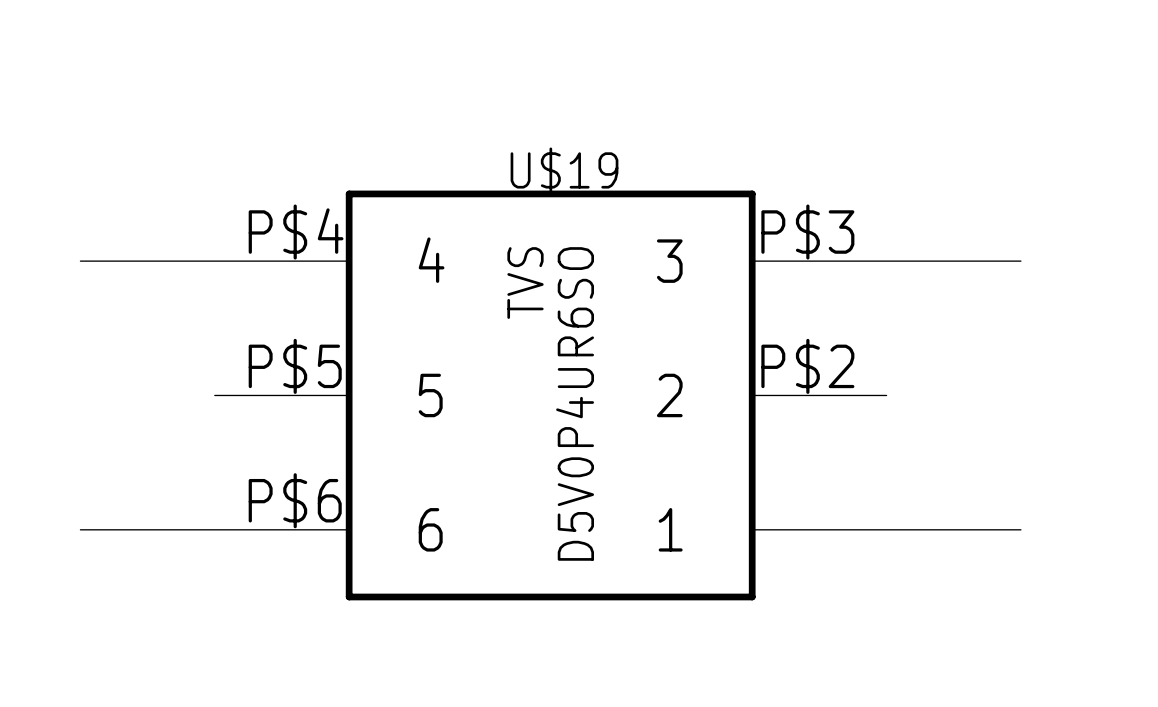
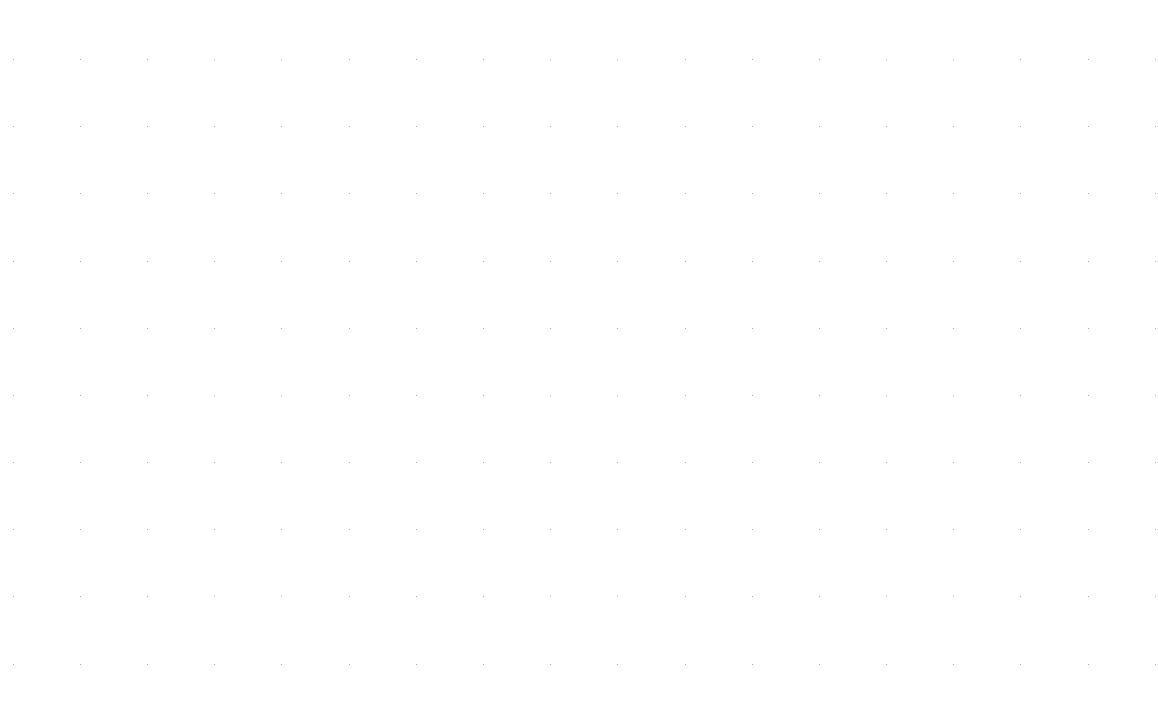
wire: (80, 261) (349, 261) -> none
wire: (752, 261) (1020, 261) -> none
wire: (214, 395) (349, 395) -> none
U$19: (550, 395) -> none
wire: (752, 395) (886, 395) -> none
wire: (80, 529) (349, 529) -> none
wire: (752, 529) (1020, 529) -> none

